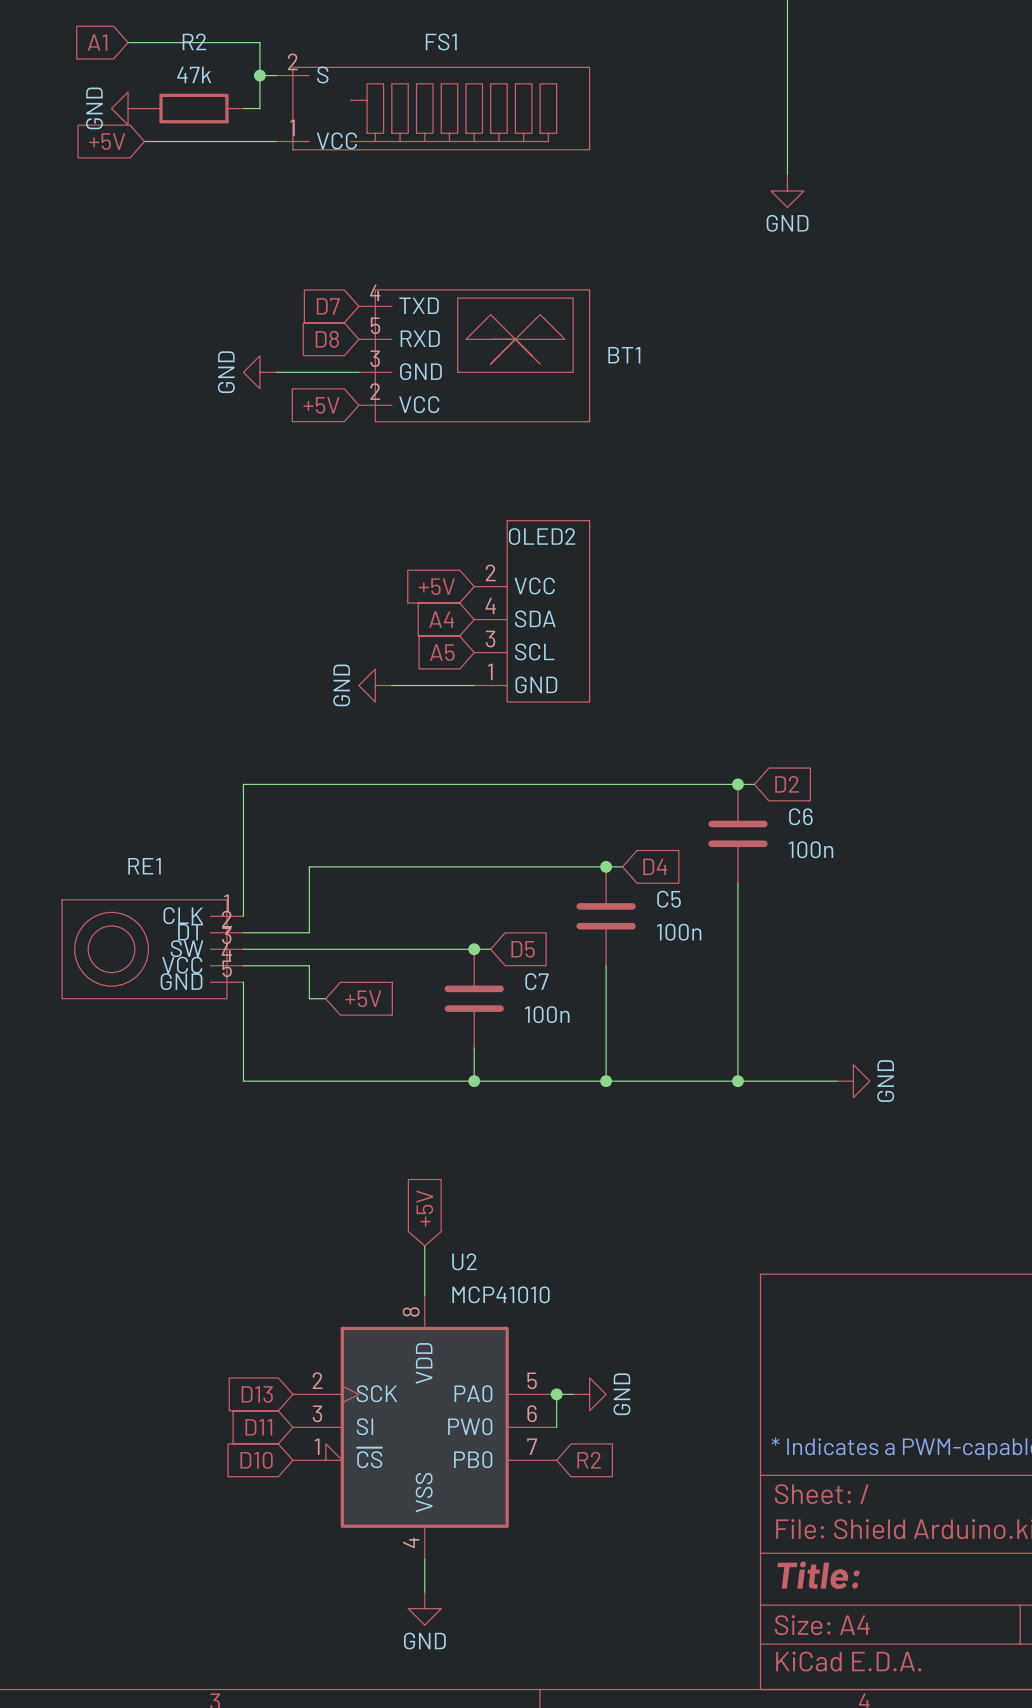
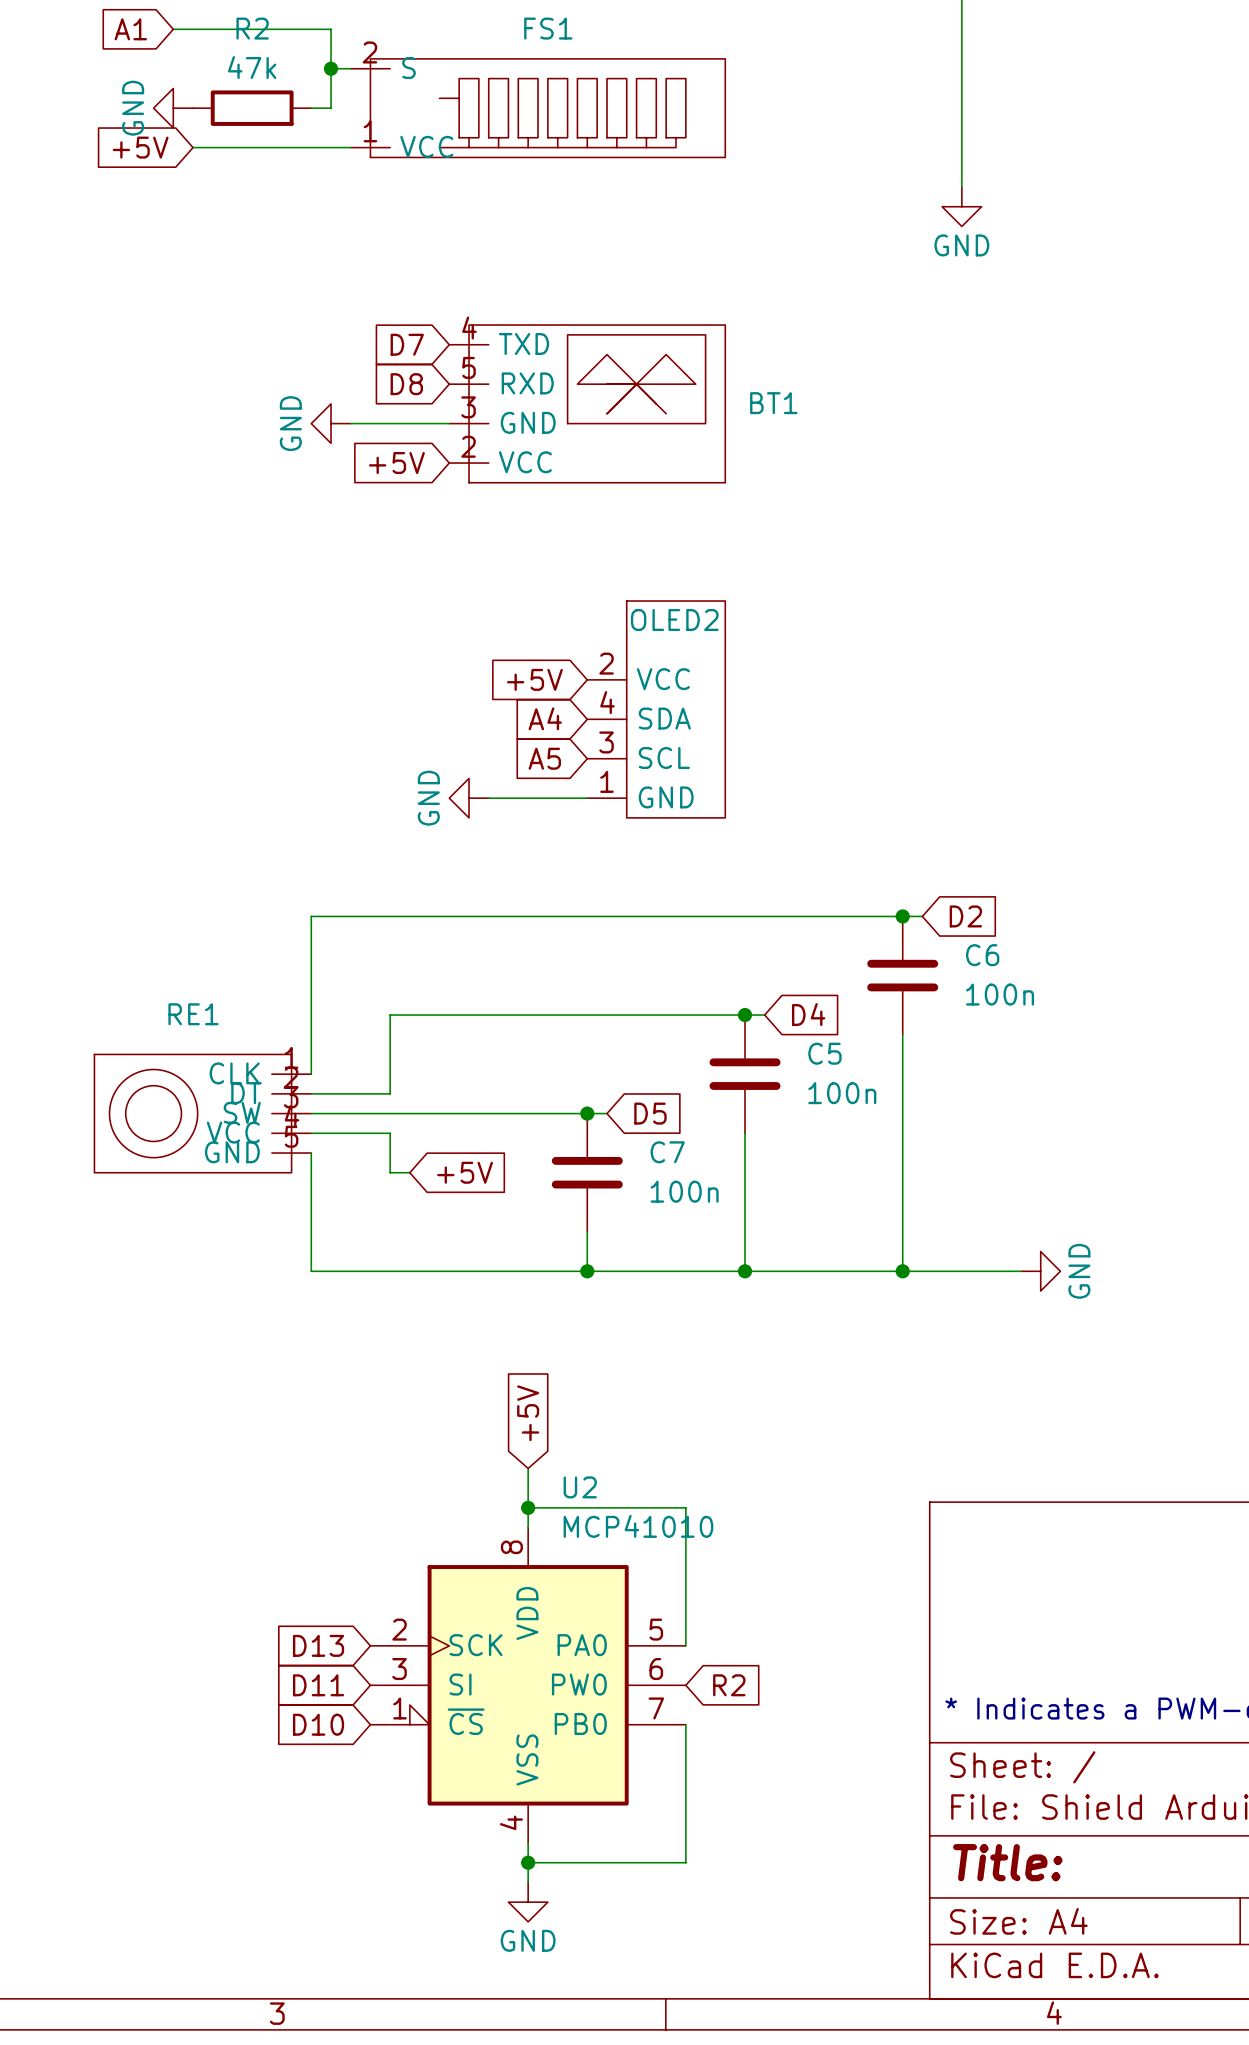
wire: none -> (528, 1507) (685, 1507) (685, 1645)
junction: none -> (528, 1507)
junction: (556, 1394) -> none
wire: (573, 1394) (556, 1394) (556, 1427) -> none
power symbol: GND (589, 1394) -> none
wire: none -> (685, 1724) (685, 1862) (528, 1862)
global label position: R2 (589, 1460) -> R2 (729, 1685)
junction: none -> (528, 1862)

